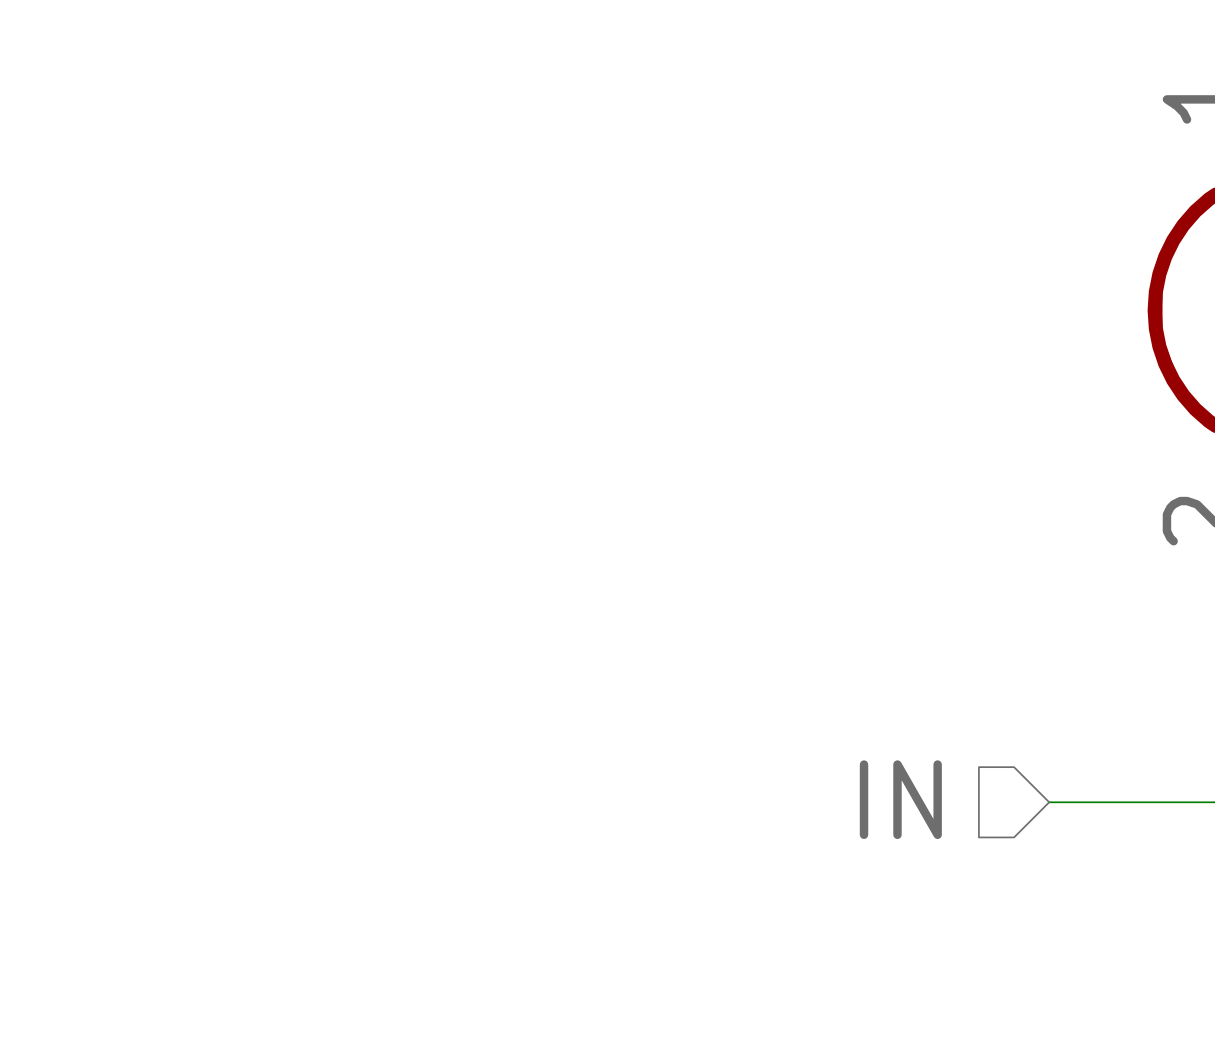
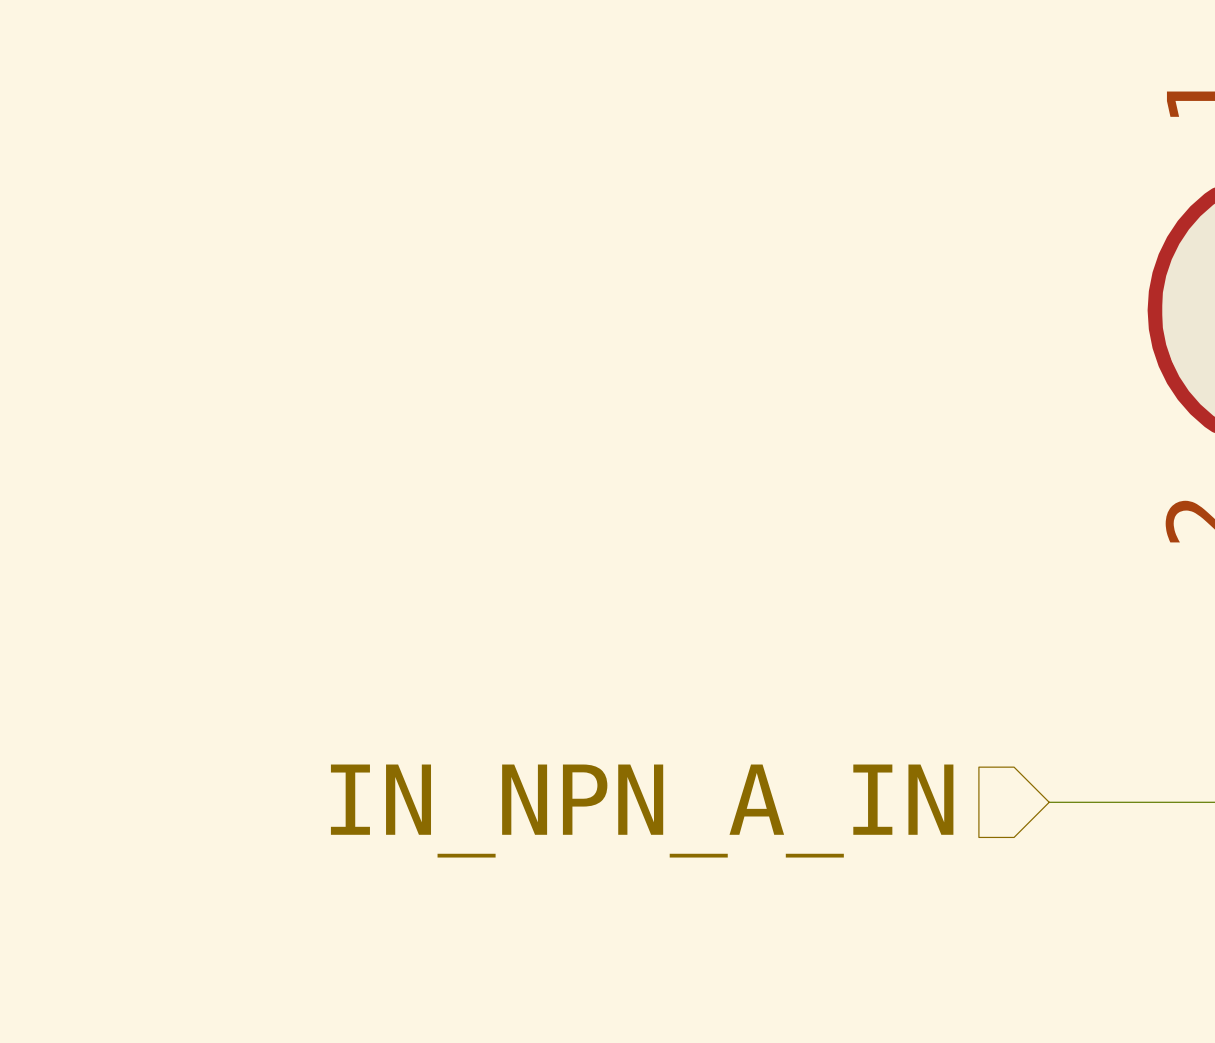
hierarchical label: IN (900, 799) -> IN_NPN_A_IN (642, 811)

